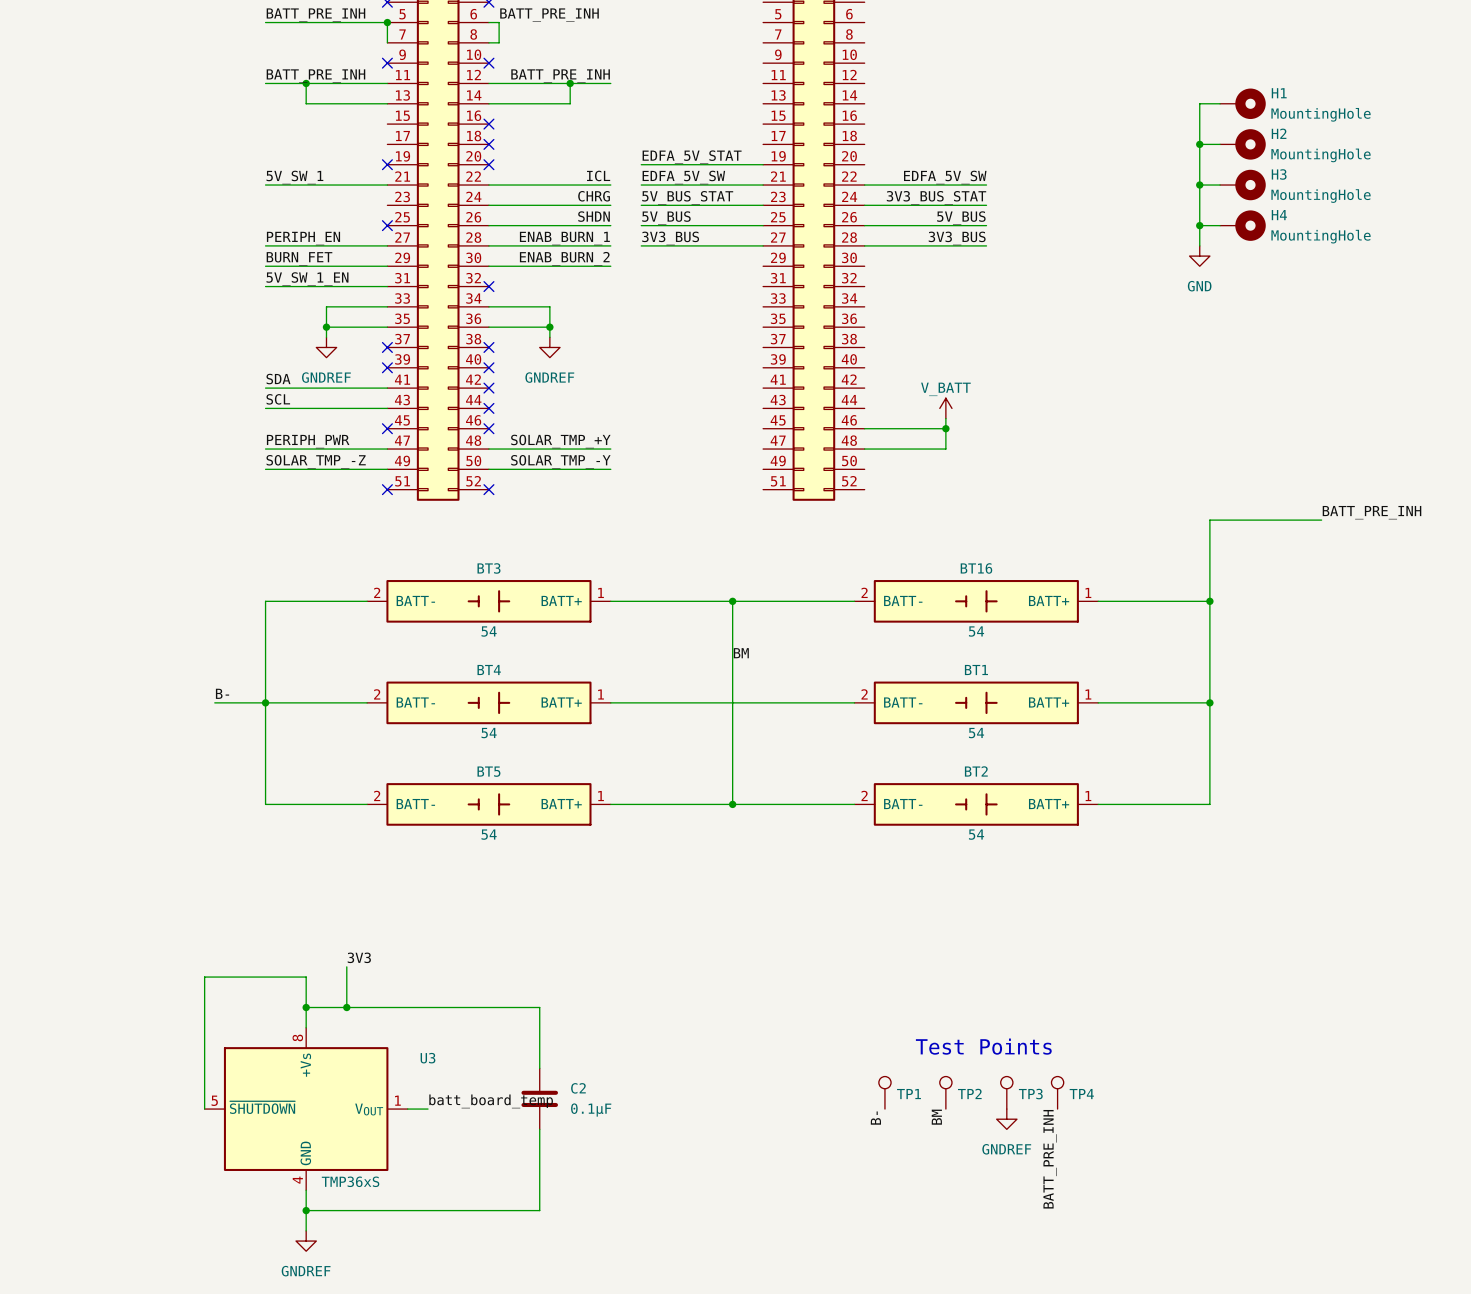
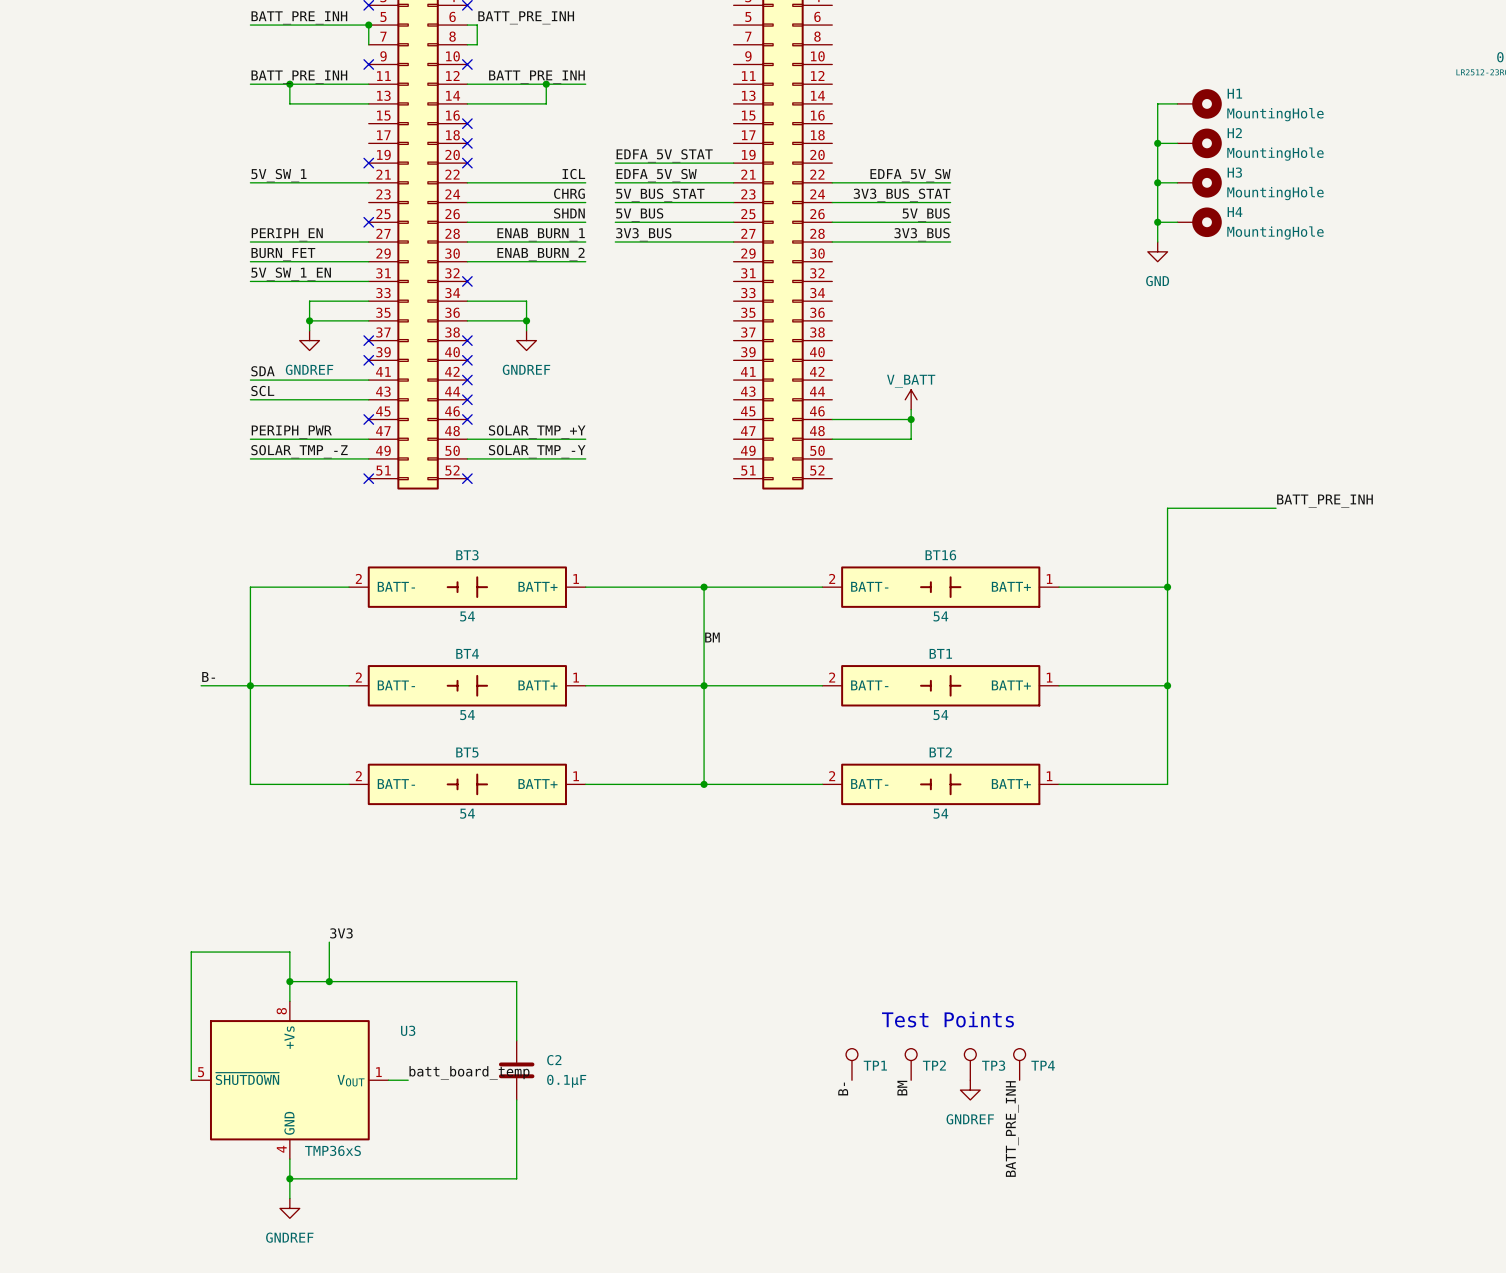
junction: none -> (704, 685)

